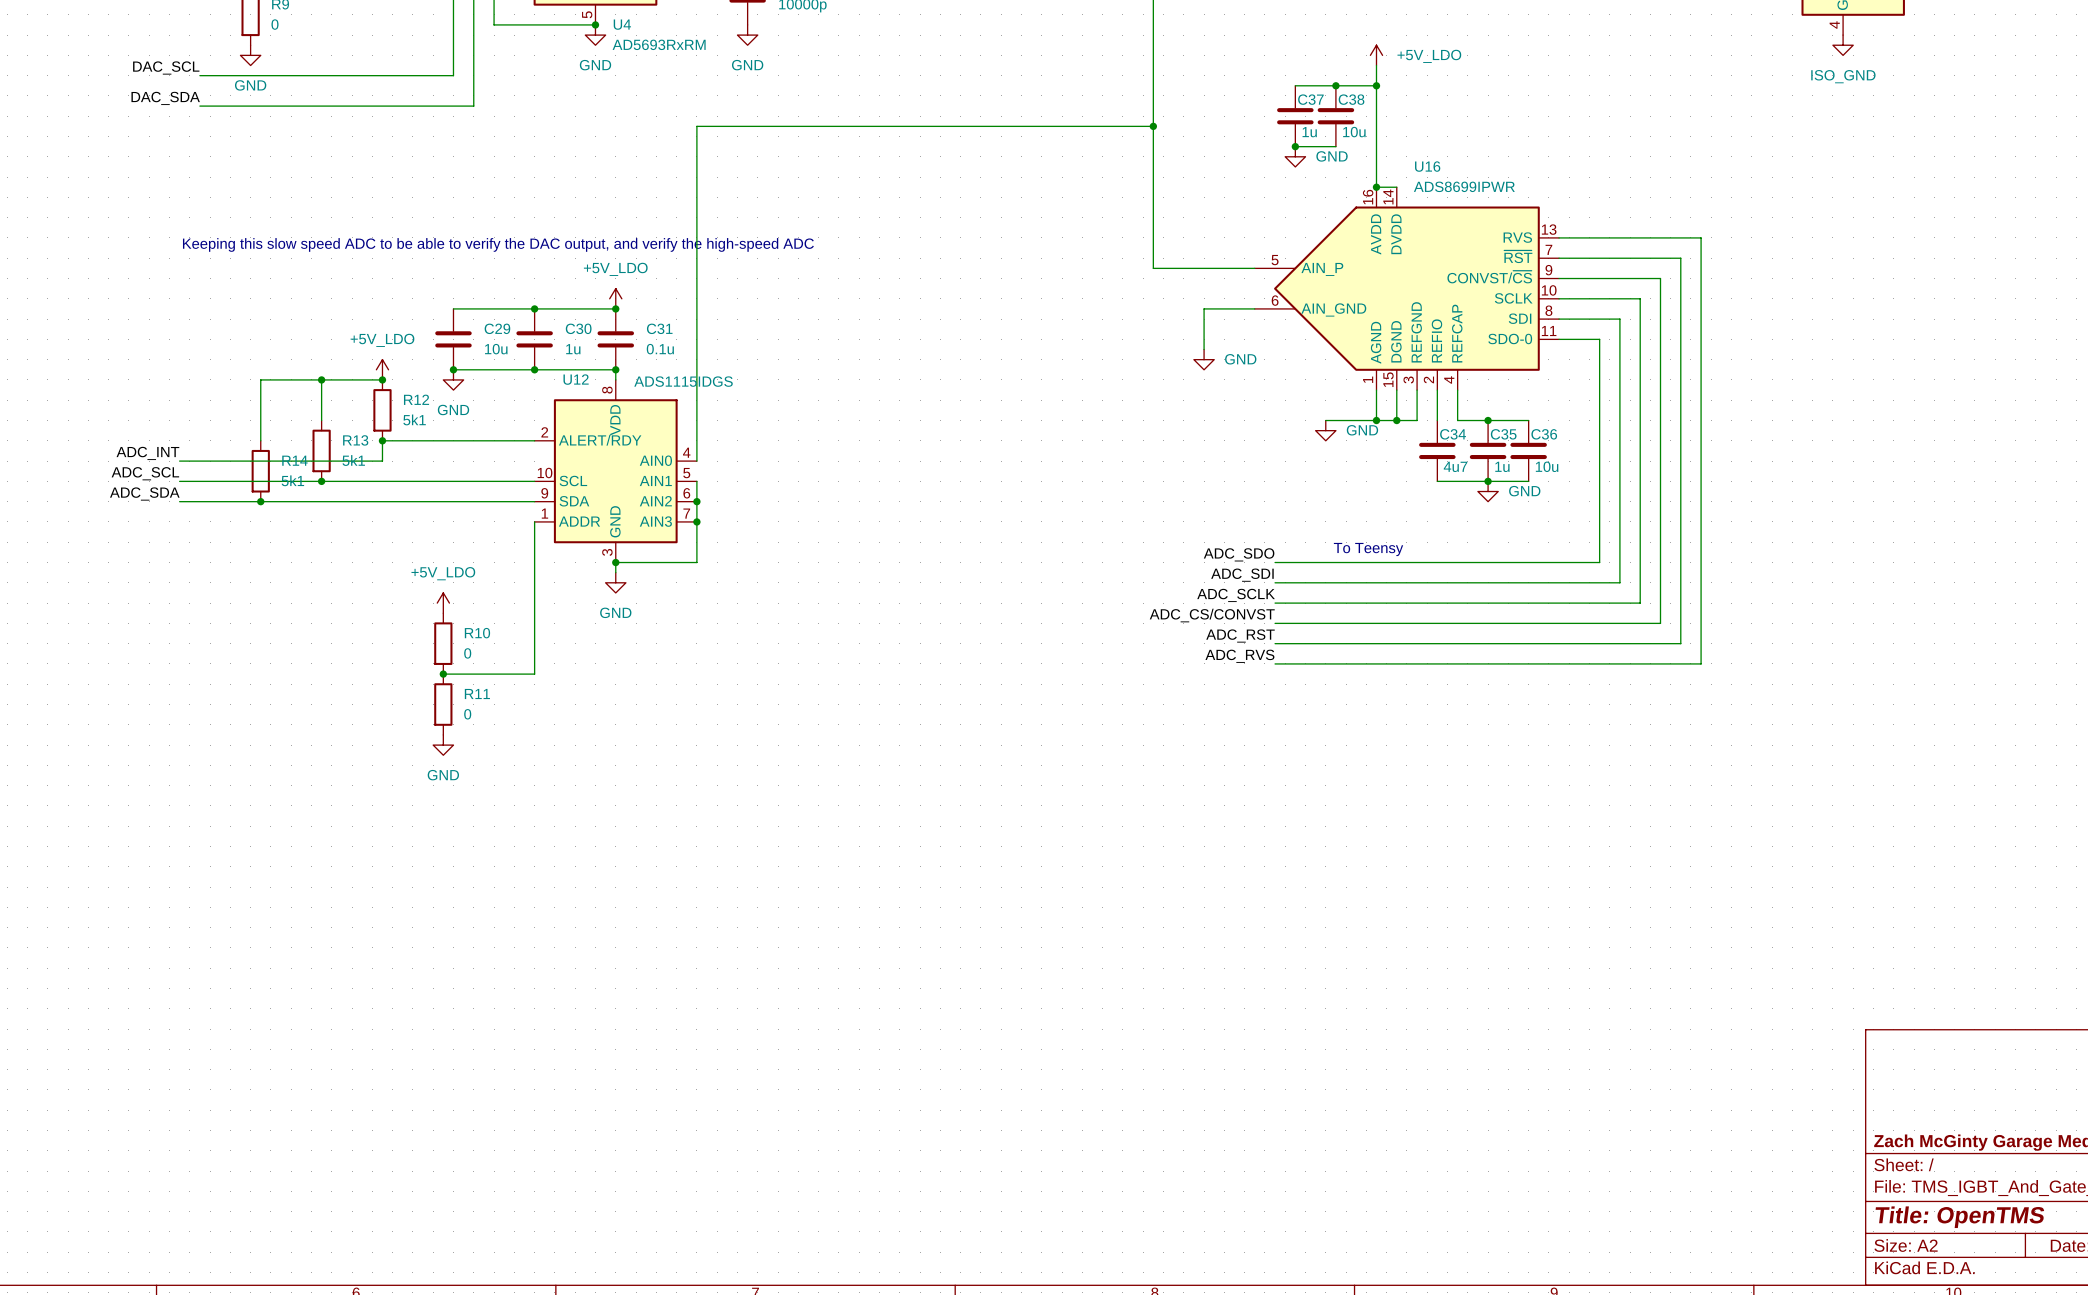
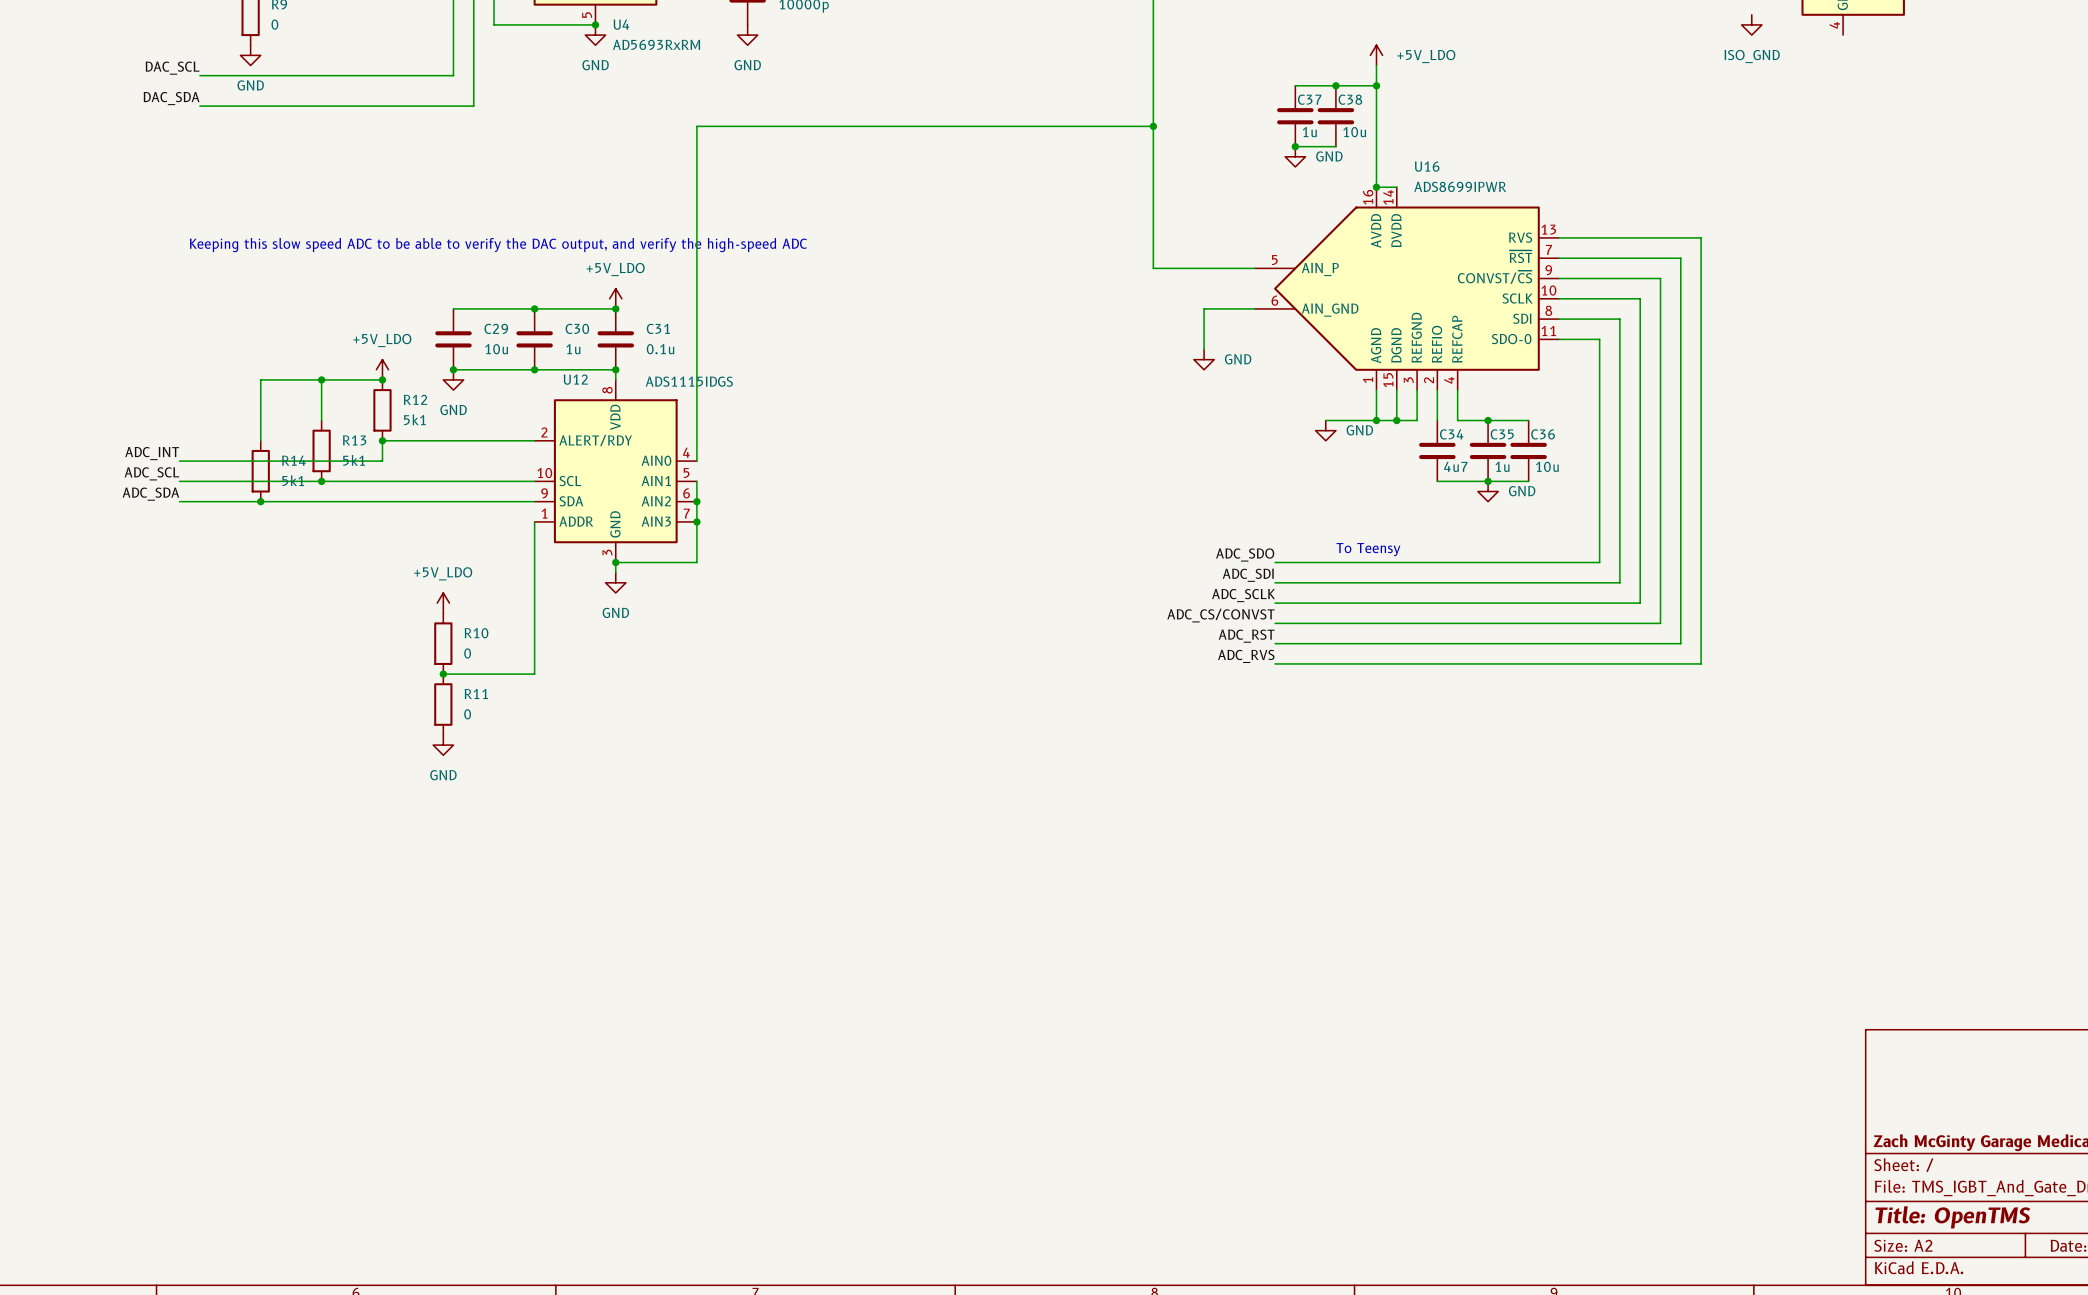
power symbol position: ISO_GND (1843, 45) -> ISO_GND (1751, 24)

